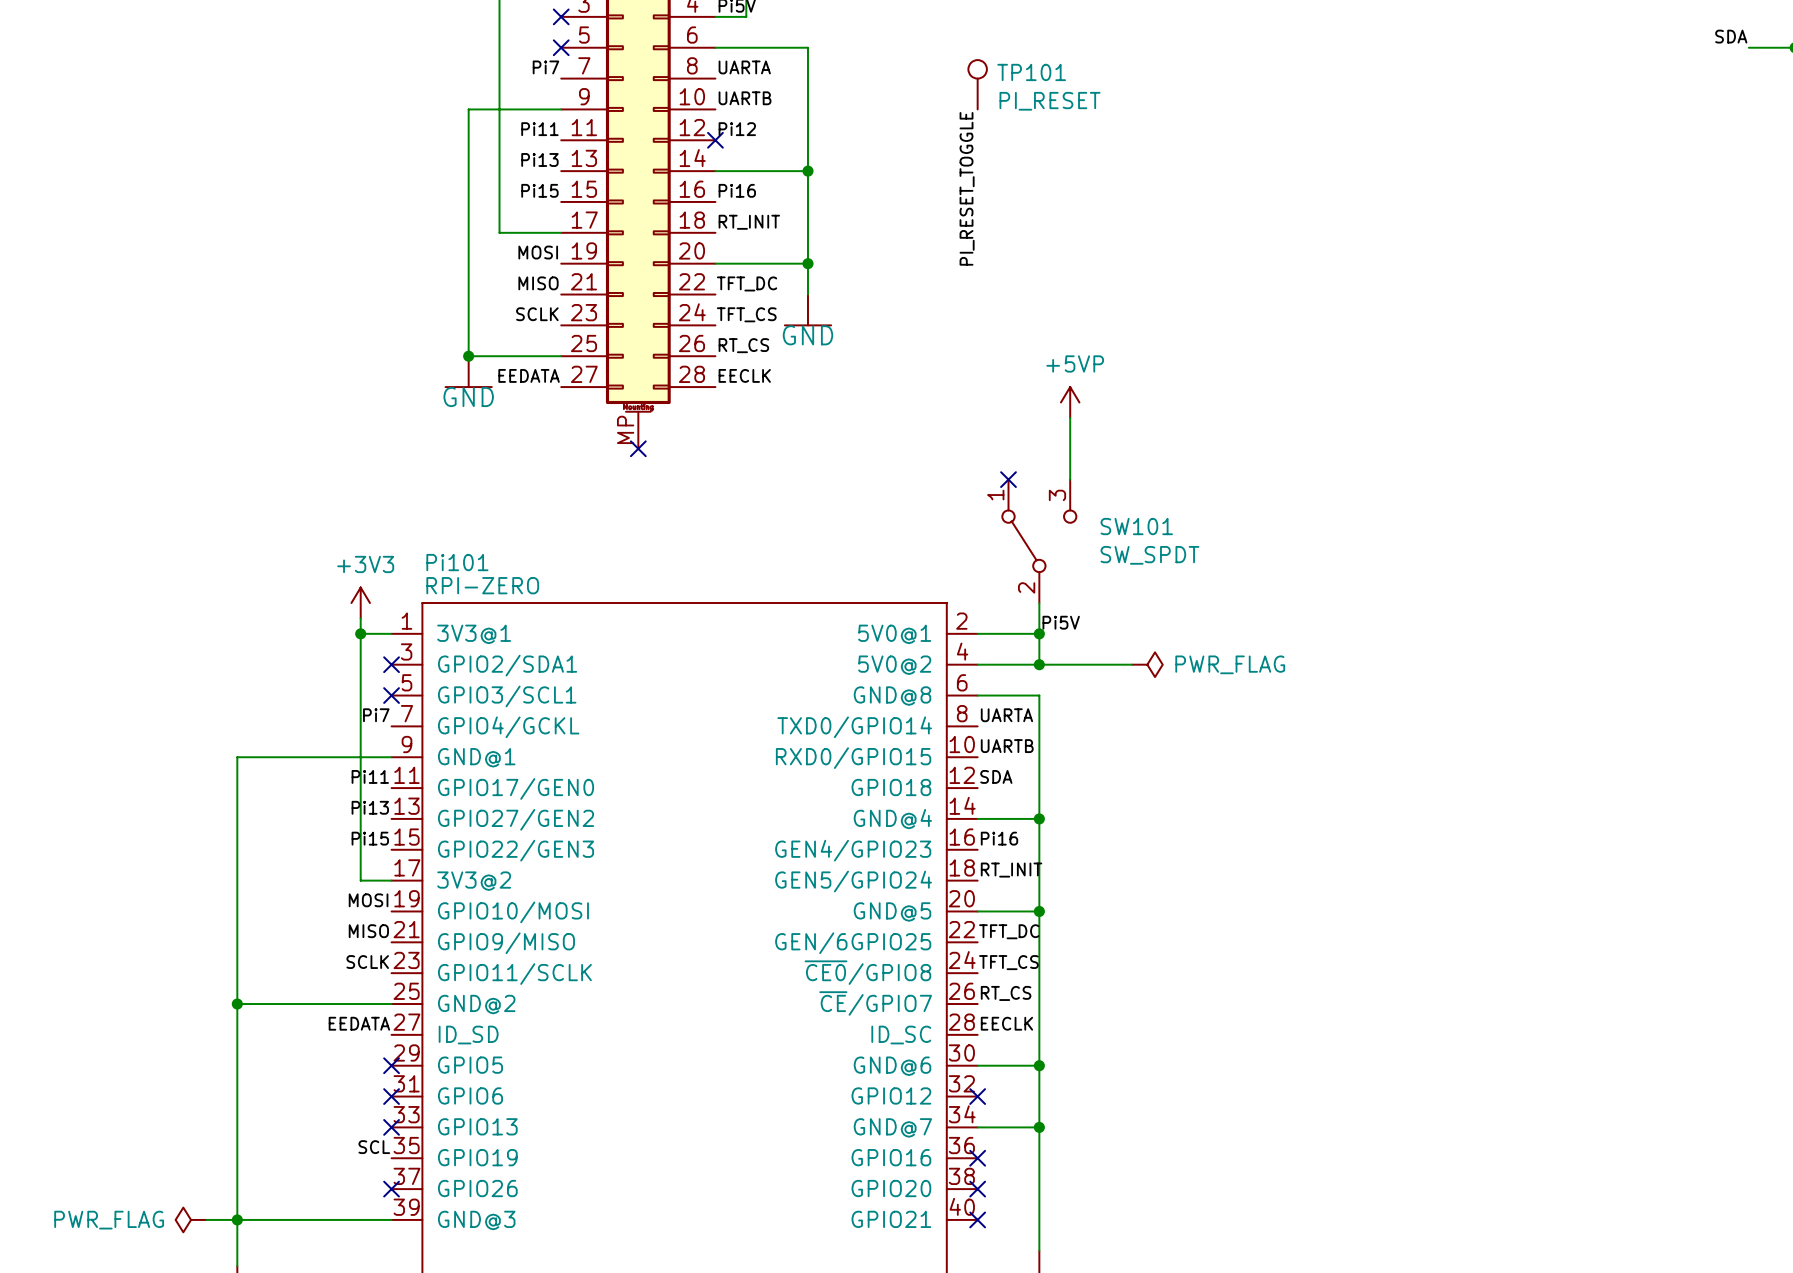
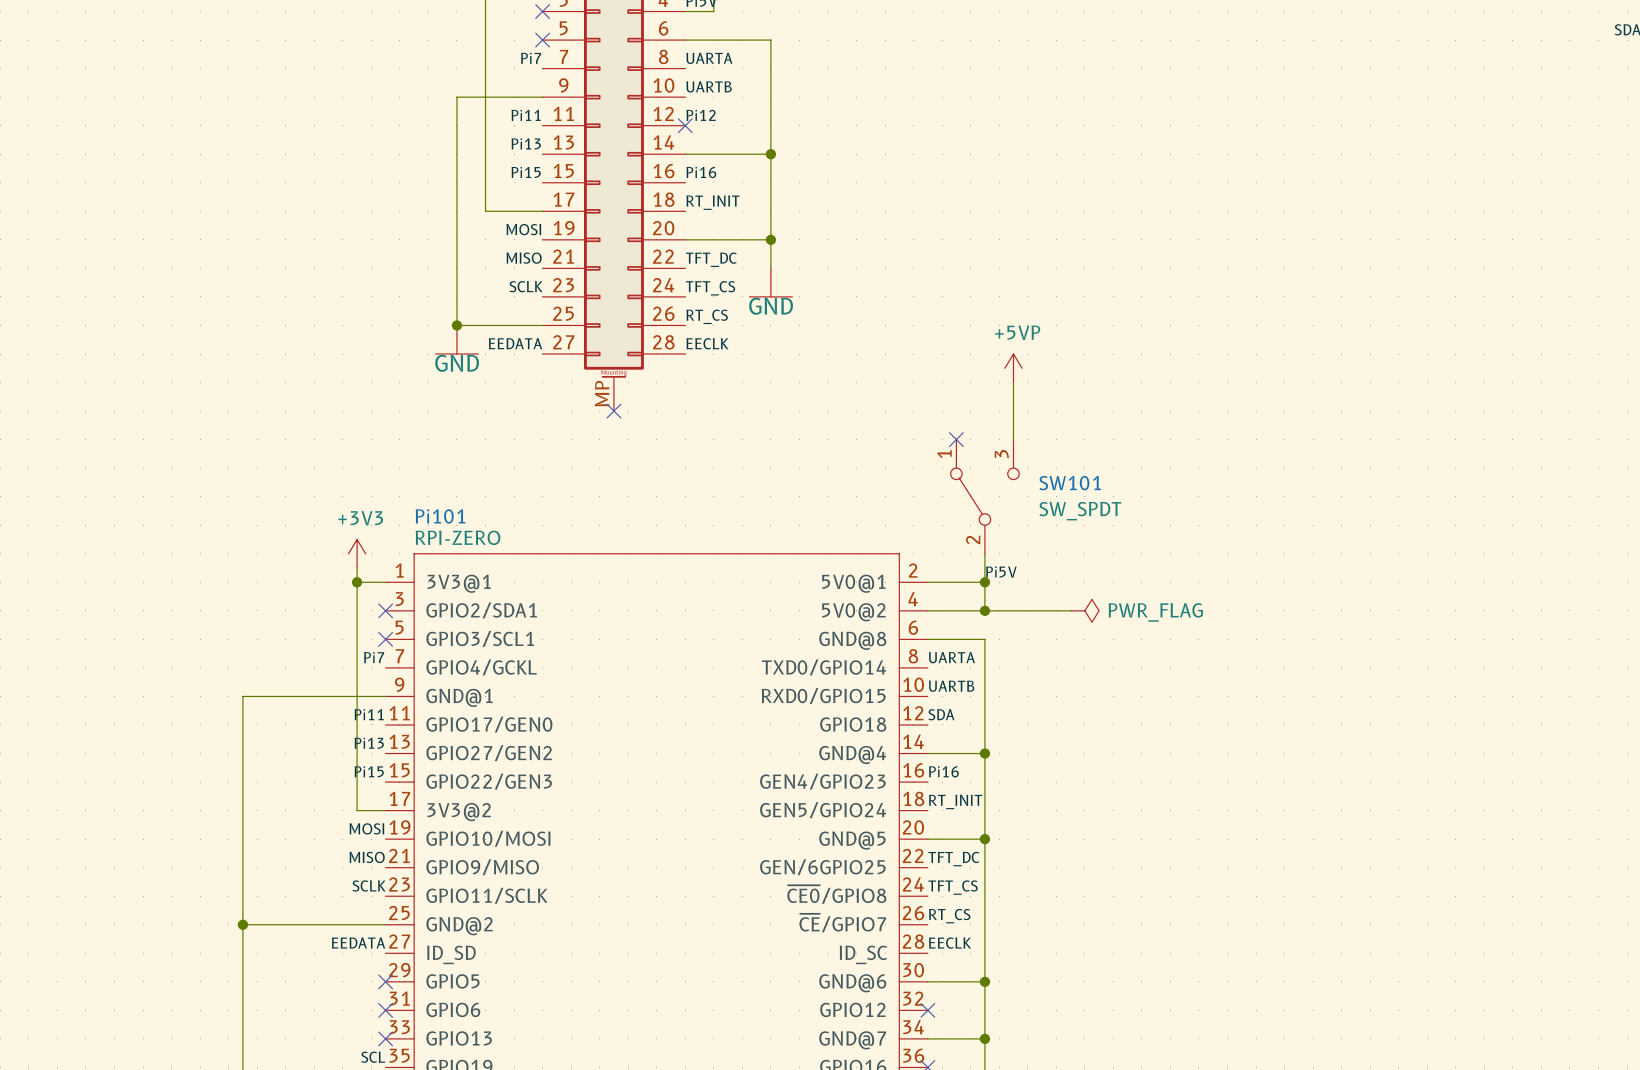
TP101: PI_RESET (977, 84) -> none
label: PI_RESET_TOGGLE (967, 188) -> none

